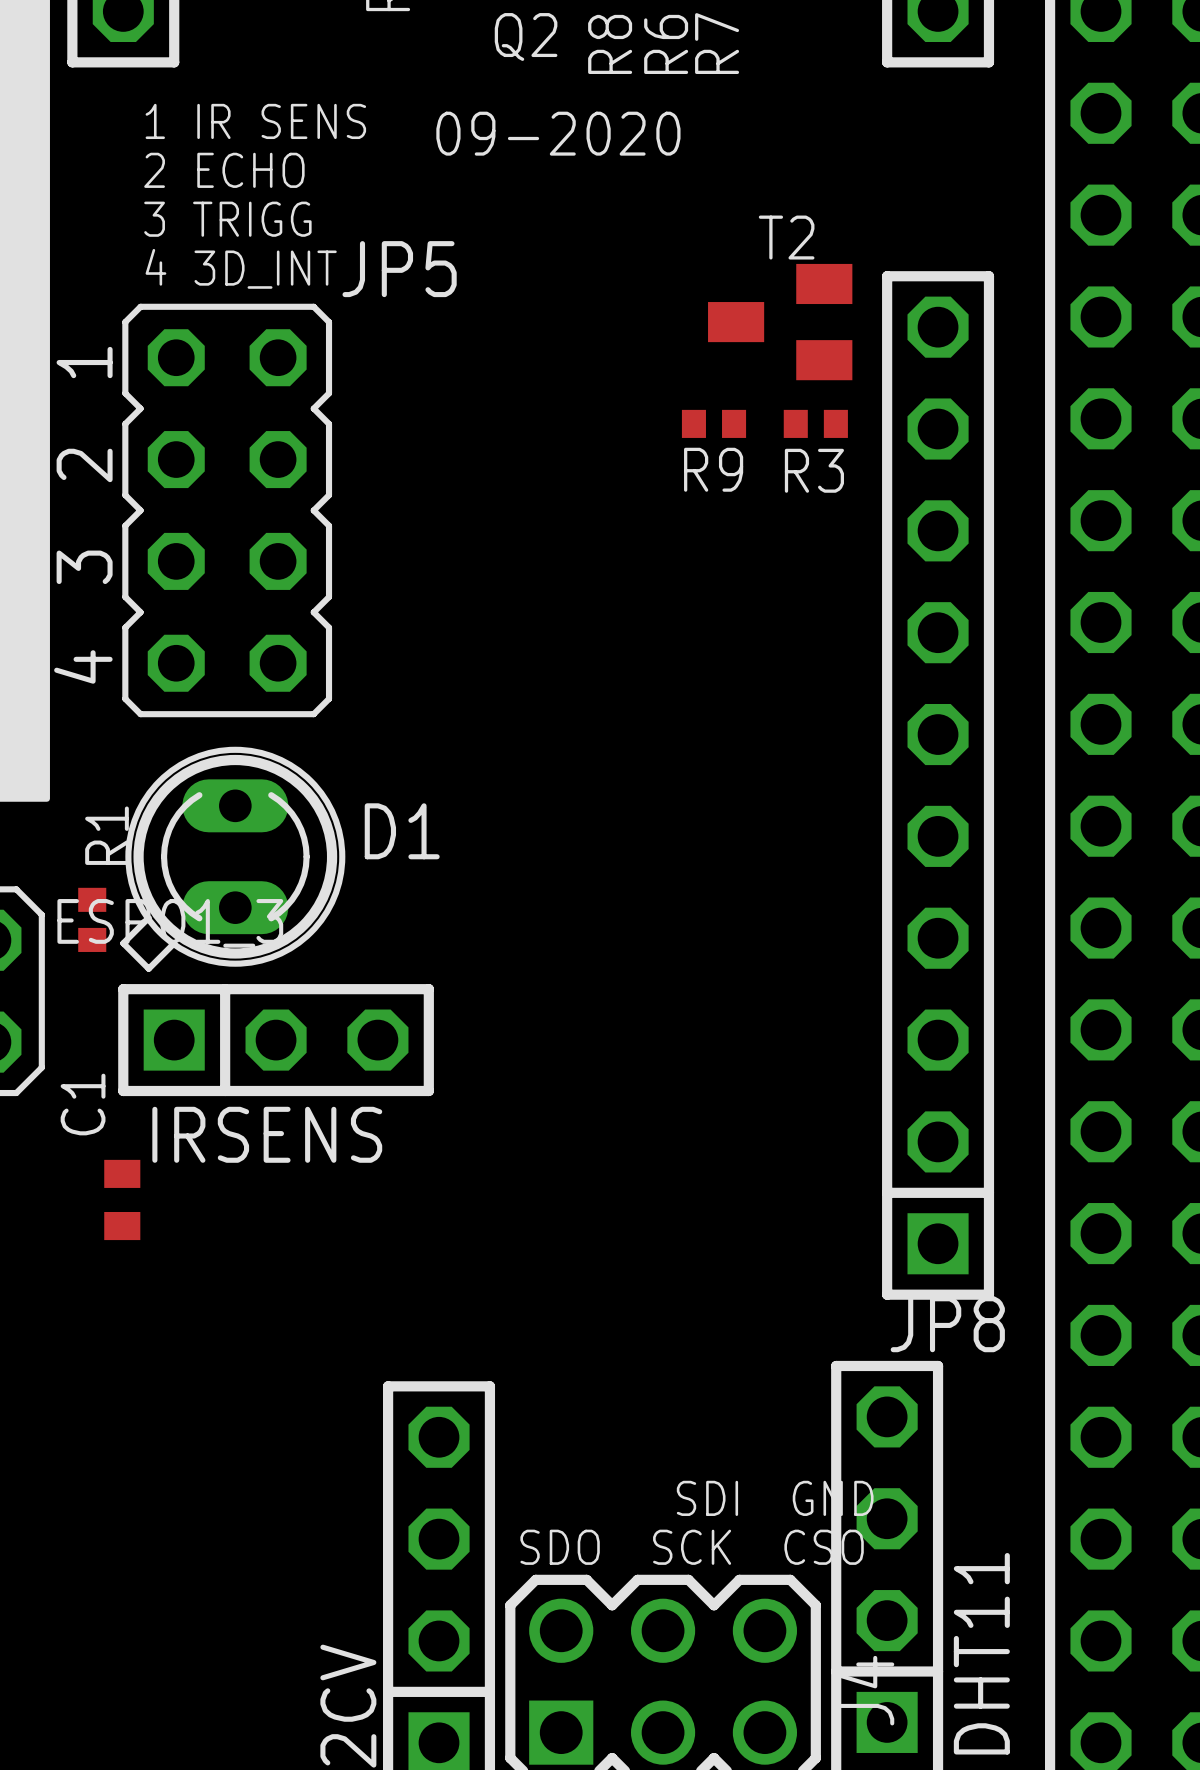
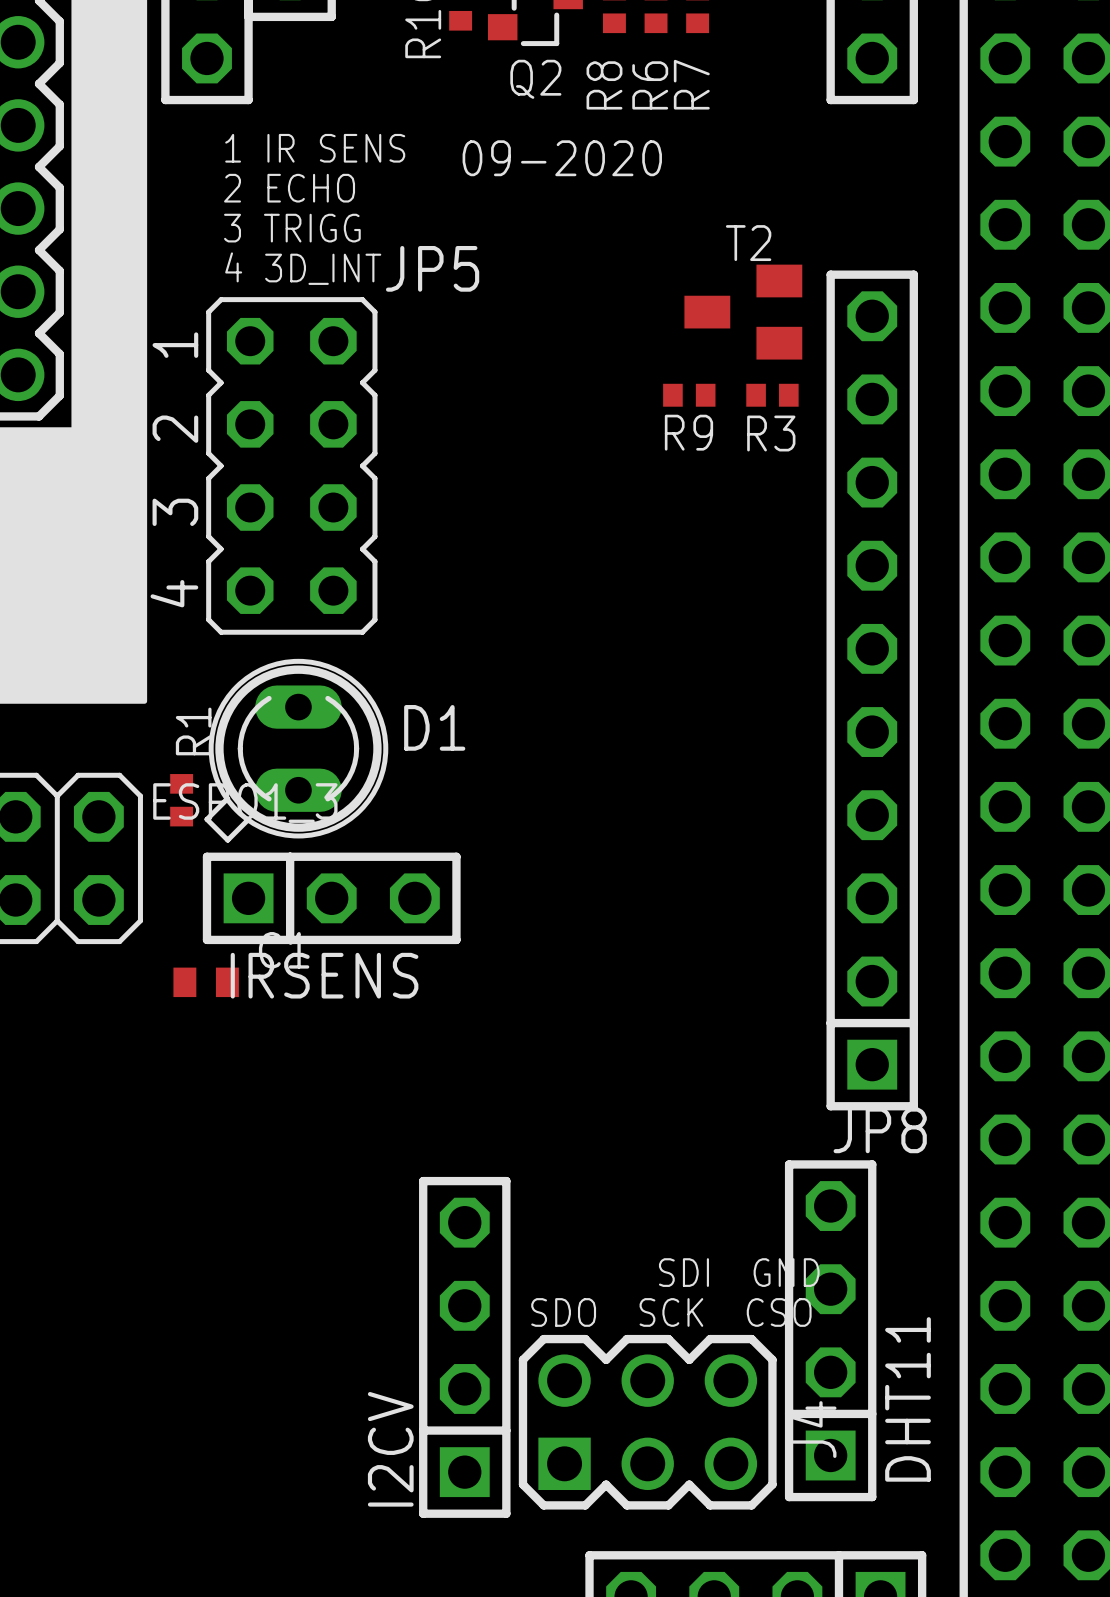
C1 rotation: 0° (122, 1199) -> 90° clockwise (206, 982)
C1 position: (122, 1199) -> (206, 982)

